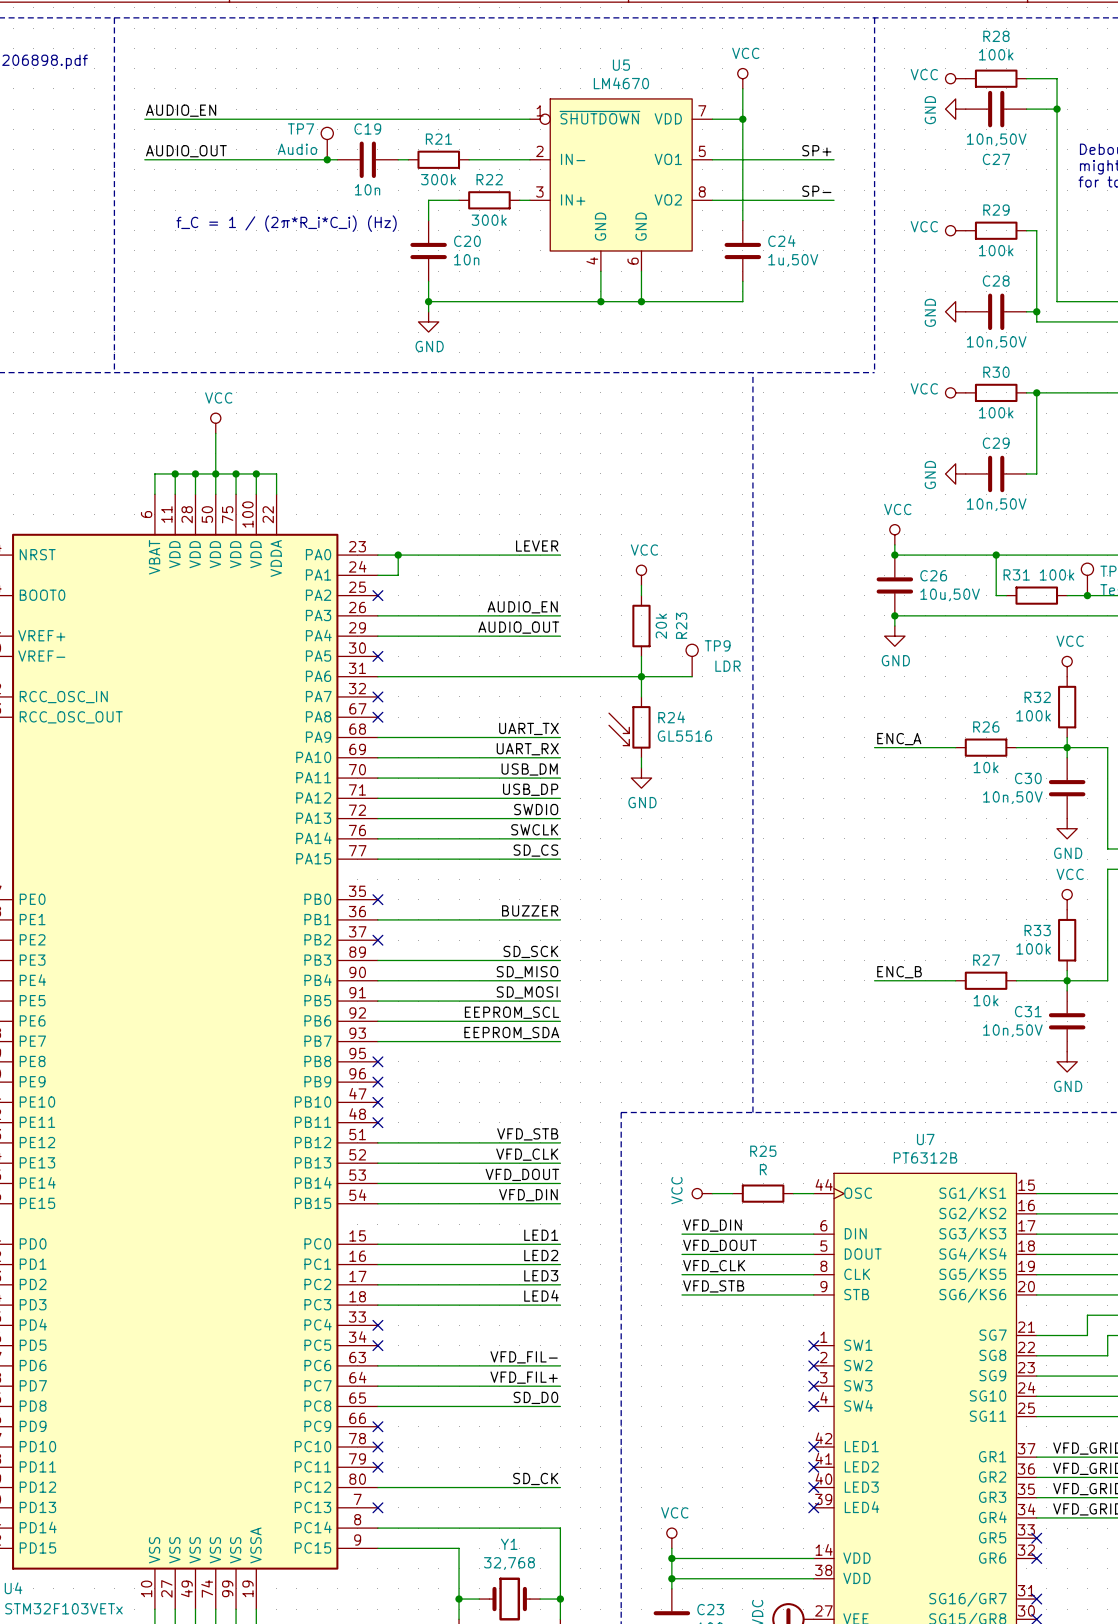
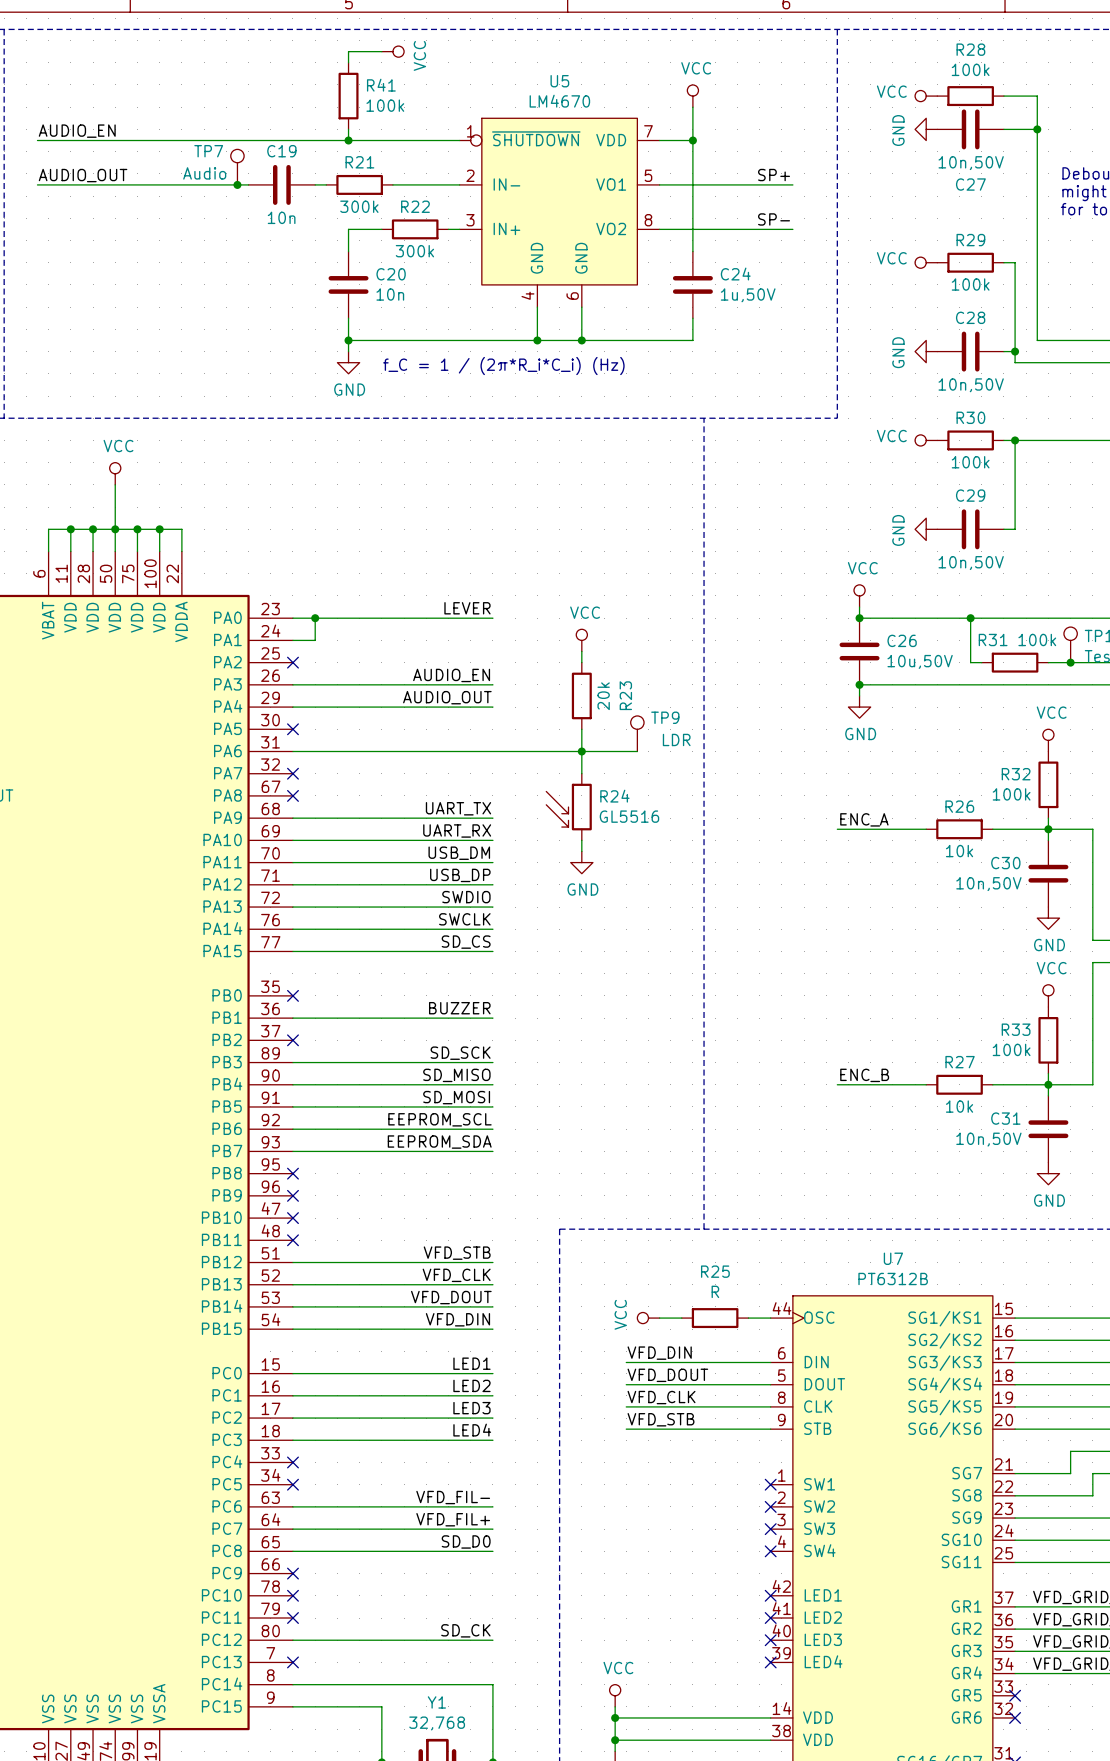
wire: none -> (381, 51) (348, 51) (348, 62)
power symbol: none -> VCC (392, 51)
R41: none -> 100k (348, 96)
wire: none -> (348, 129) (348, 140)
junction: none -> (348, 140)
text: f_C = 1 / (2π*R_i*C_i) (Hz) (286, 223) -> none
text: none -> f_C = 1 / (2π*R_i*C_i) (Hz) (503, 366)

